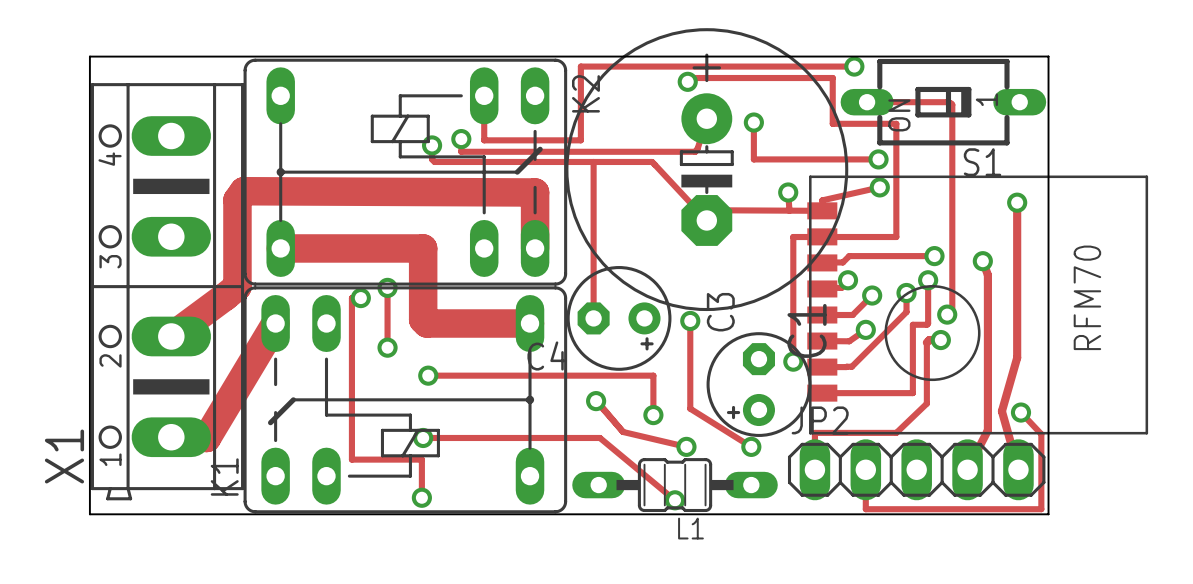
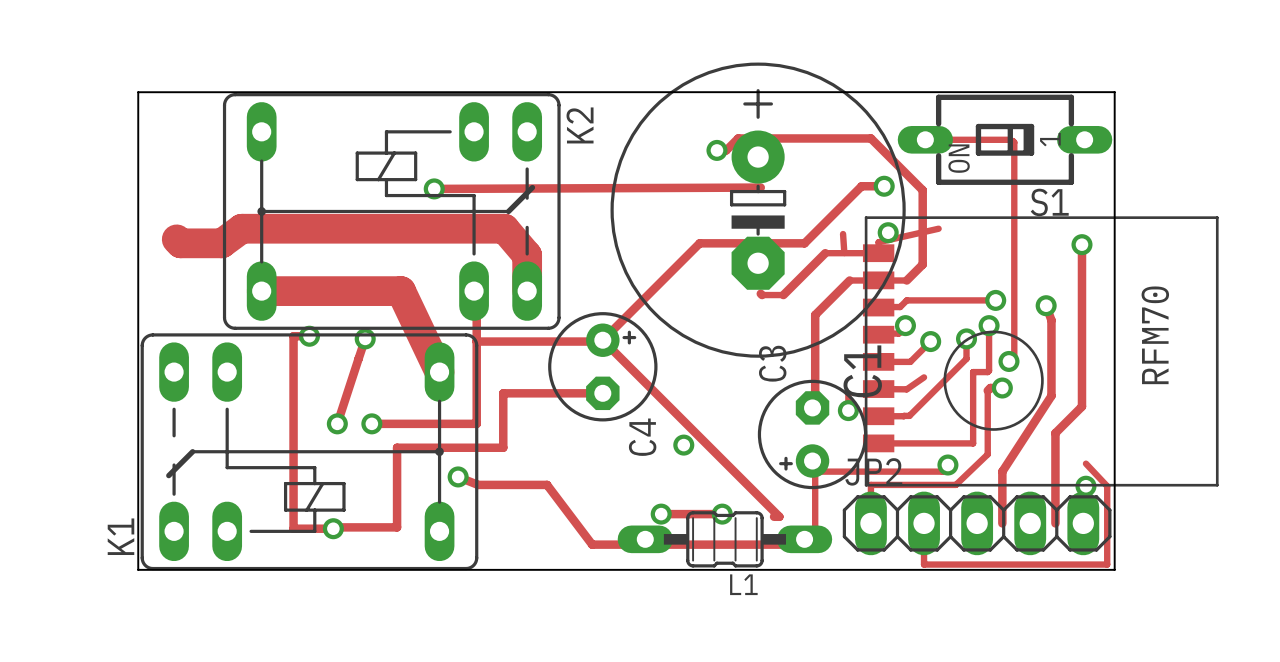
board edge: (112, 56) (89, 56) (89, 514) (112, 514) -> (138, 92) (138, 569)
track: (854, 66) (580, 66) (580, 140) (484, 140) (484, 95) -> none
via: (854, 66) -> none
track: (687, 81) (690, 78) (832, 78) (832, 123) (896, 123) (896, 237) (849, 237) -> (716, 150) (726, 150) (738, 138) (870, 138) (922, 190) (922, 264) (906, 280)
via position: (687, 81) -> (716, 150)
track: (706, 118) (695, 151) (461, 151) (461, 139) -> none
track: (753, 122) (753, 159) (878, 159) -> none
via: (753, 122) -> none
via: (461, 139) -> none
track: (432, 145) (432, 159) (434, 161) (652, 161) (706, 220) (720, 210) (822, 210) -> (760, 293) (783, 295) (825, 253) (878, 253)
via: (432, 145) -> none
track: none -> (884, 186) (861, 186) (804, 243) (699, 243) (602, 340)
via: none -> (884, 186)
track: none -> (760, 187) (434, 188)
via: none -> (434, 188)
via: (878, 159) -> none
track: (593, 161) (593, 318) -> none
K2 position: (405, 172) -> (391, 211)
via: (879, 187) -> none
via: none -> (888, 232)
via: (788, 192) -> none
track: none -> (176, 239) (180, 243) (221, 243) (241, 228) (504, 228) (527, 255) (527, 291)
track: (794, 237) (793, 345) -> (849, 280) (815, 315) (815, 403)
track: none -> (261, 291) (401, 291) (439, 372)
track: none -> (474, 291) (476, 293) (476, 423) (371, 423)
track: (280, 248) (423, 248) (423, 319) (426, 323) (530, 323) -> none
track: (535, 248) (535, 192) (243, 191) (237, 200) (237, 286) (171, 336) -> none
track: (387, 287) (387, 347) -> none
via: (387, 287) -> none
track: none -> (309, 336) (293, 336) (293, 528) (397, 527) (397, 447) (503, 447) (503, 393) (602, 393)
via: none -> (309, 336)
X1: (167, 291) -> none
track: none -> (365, 338) (337, 423)
via: none -> (365, 338)
track: none -> (602, 340) (476, 341)
track: none -> (602, 340) (779, 516) (774, 516)
track: (360, 298) (351, 298) (351, 459) (421, 459) (421, 497) -> none
via: (360, 298) -> none
C4 rotation: 0° (619, 318) -> 90° counterclockwise (602, 366)
track: (690, 320) (690, 408) (751, 446) -> none
via: (690, 320) -> none
track: (275, 323) (206, 437) (171, 437) -> none
via: (865, 329) -> none
via: (387, 347) -> none
track: (987, 347) (987, 430) (967, 469) -> (1051, 395) (1002, 471) (1002, 523)
track: (1017, 357) (1001, 411) (1018, 469) -> (1081, 406) (1055, 433) (1055, 523)
via: none -> (337, 423)
via: none -> (371, 423)
track: (428, 375) (653, 375) (653, 415) -> none
via: (428, 375) -> none
via: none -> (683, 445)
K1 position: (405, 399) -> (309, 451)
via: (596, 401) -> none
via position: (1020, 412) -> (1085, 486)
track: none -> (947, 465) (942, 471) (815, 471) (815, 544) (592, 544) (547, 484) (478, 484) (458, 476)
via: none -> (947, 465)
via: (653, 415) -> none
track: (623, 431) (686, 446) -> none
track: (623, 431) (596, 401) (597, 401) (623, 431) -> none
track: (423, 437) (599, 437) (675, 500) -> none
via position: (423, 437) -> (458, 476)
via position: (686, 446) -> (722, 514)
via: (751, 446) -> none
track: none -> (661, 514) (722, 514)
via: none -> (661, 514)
via: none -> (333, 528)
via: (421, 497) -> none
via: (675, 500) -> none

